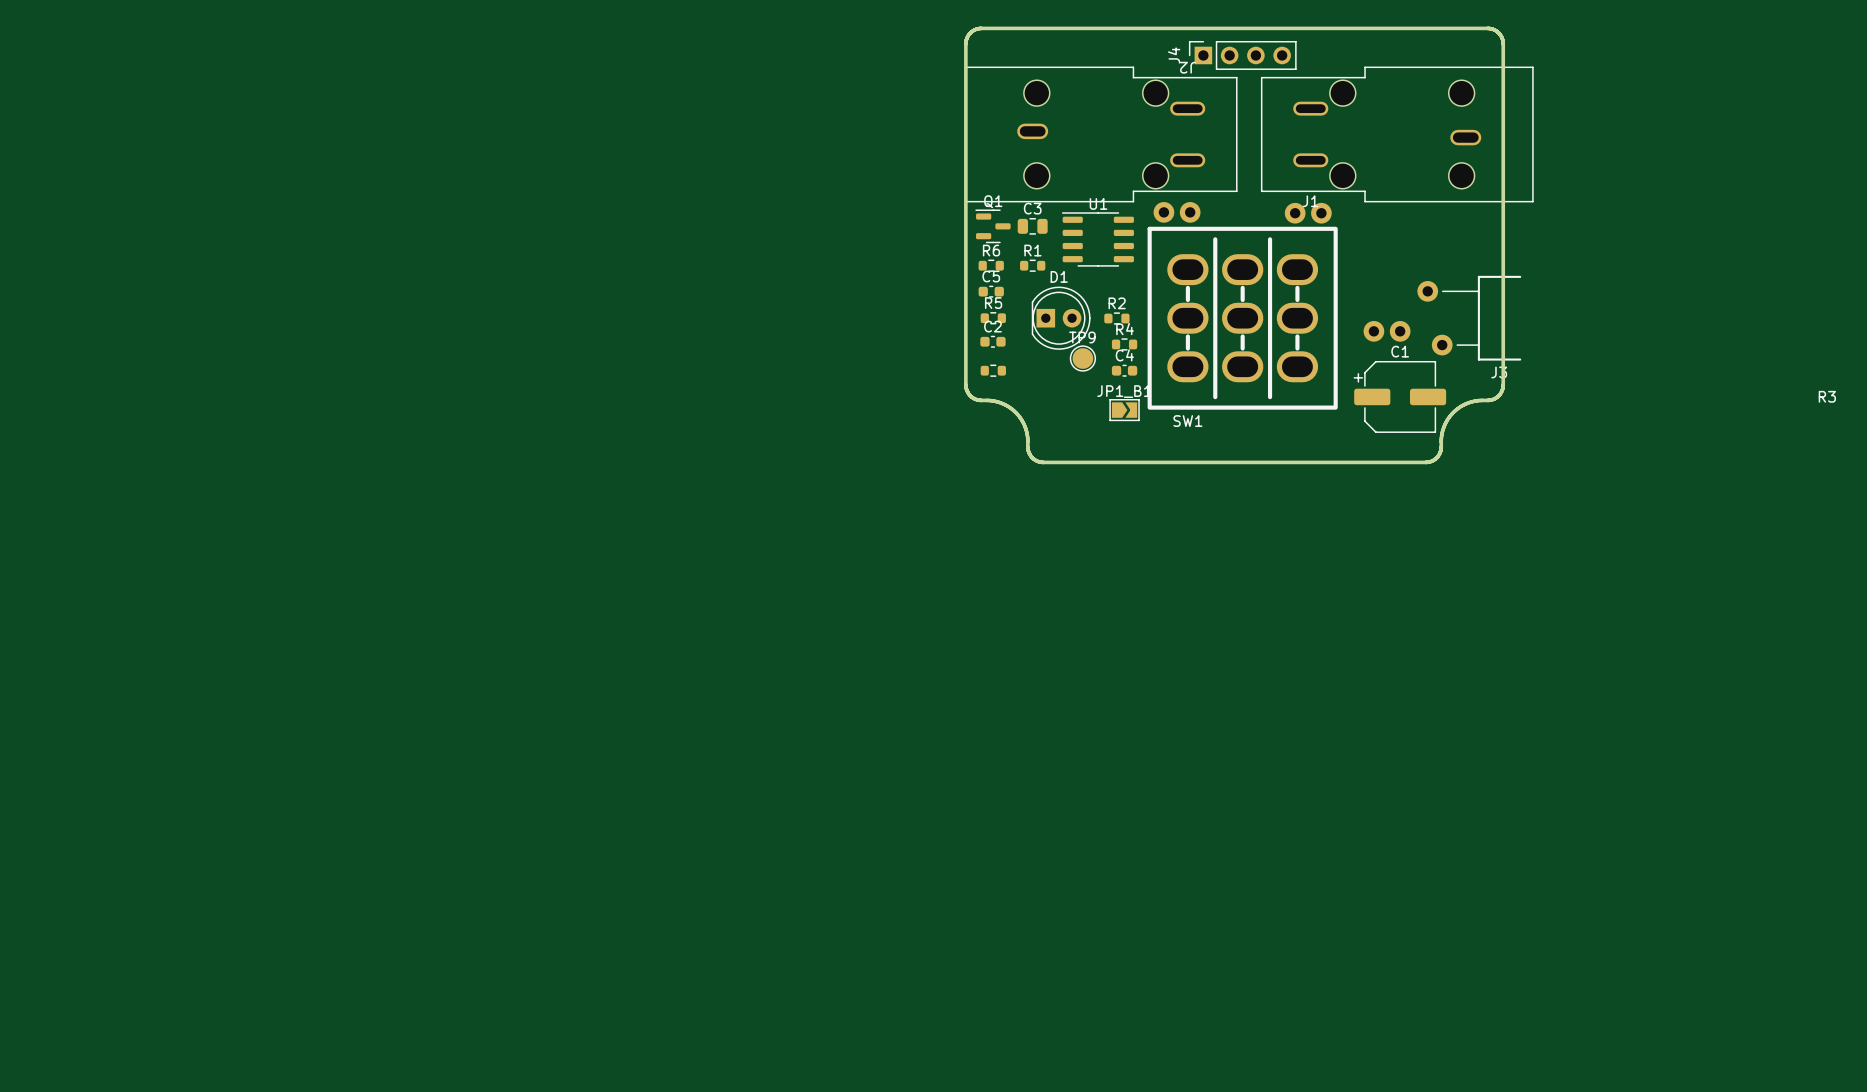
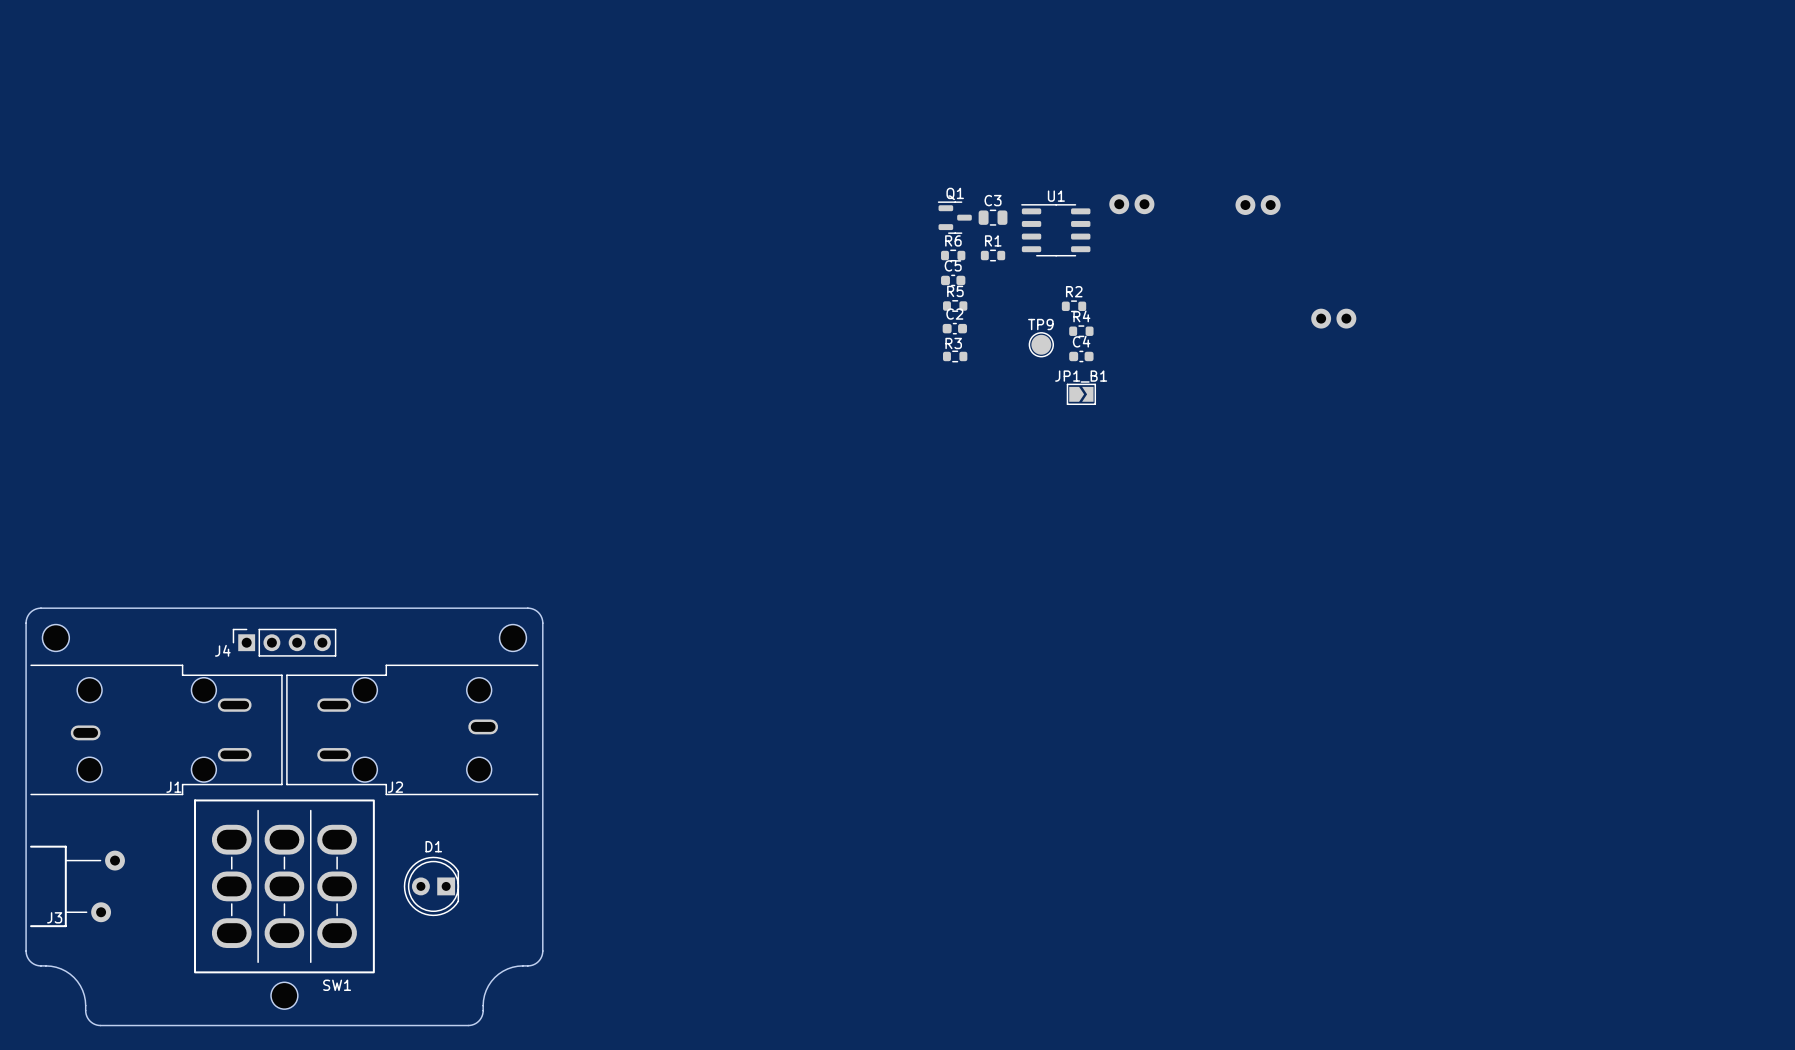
board edge: (979, 28) (1487, 28) (1496, 31) (1501, 36) (1503, 43) (1503, 384) (1500, 393) (1492, 399) (1470, 402) (1454, 411) (1443, 427) (1439, 454) (1434, 459) (1428, 462) (1043, 462) (1034, 459) (1028, 452) (1026, 429) (1017, 414) (1000, 402) (974, 398) (968, 394) (966, 387) (965, 43) (970, 32) (979, 28) -> none
J4 name rotation: 0° (1174, 55) -> 90° clockwise (222, 650)
J4 position: (1242, 55) -> (284, 642)
J2 side: top (1101, 134) -> bottom (407, 729)
J1 side: top (1397, 134) -> bottom (161, 729)
D1 side: top (1061, 318) -> bottom (433, 886)
SW1 side: top (1242, 318) -> bottom (284, 886)
J3 side: top (1469, 318) -> bottom (108, 886)
C1: (1399, 396) -> none
R3 name position: R3 (1827, 396) -> R3 (953, 343)
board edge: none -> (40, 608) (527, 608) (536, 611) (540, 615) (542, 623) (542, 951) (539, 960) (531, 965) (507, 968) (494, 977) (484, 995) (481, 1018) (475, 1023) (470, 1025) (100, 1025) (91, 1022) (86, 1014) (82, 990) (74, 977) (56, 967) (33, 963) (28, 958) (26, 952) (26, 623) (30, 612) (40, 608)
part: none -> (55, 637)
part: none -> (512, 637)
line: none -> (31, 665) (182, 665) (182, 675) (281, 675) (281, 784) (182, 784) (182, 794) (31, 794)
line: none -> (537, 665) (386, 665) (386, 675) (286, 675) (286, 784) (386, 784) (386, 794) (537, 794)
line: none -> (31, 846) (65, 846) (65, 926) (31, 926)
line: none -> (65, 860) (100, 860)
drawing: none -> [408, 860, 459, 912]
line: none -> (458, 871) (458, 901) (447, 911) (436, 915) (425, 914) (415, 909) (408, 900) (404, 890) (405, 878) (410, 868) (418, 861) (429, 857) (440, 858) (450, 863) (458, 871)
line: none -> (65, 912) (86, 912)
part: none -> (284, 995)

